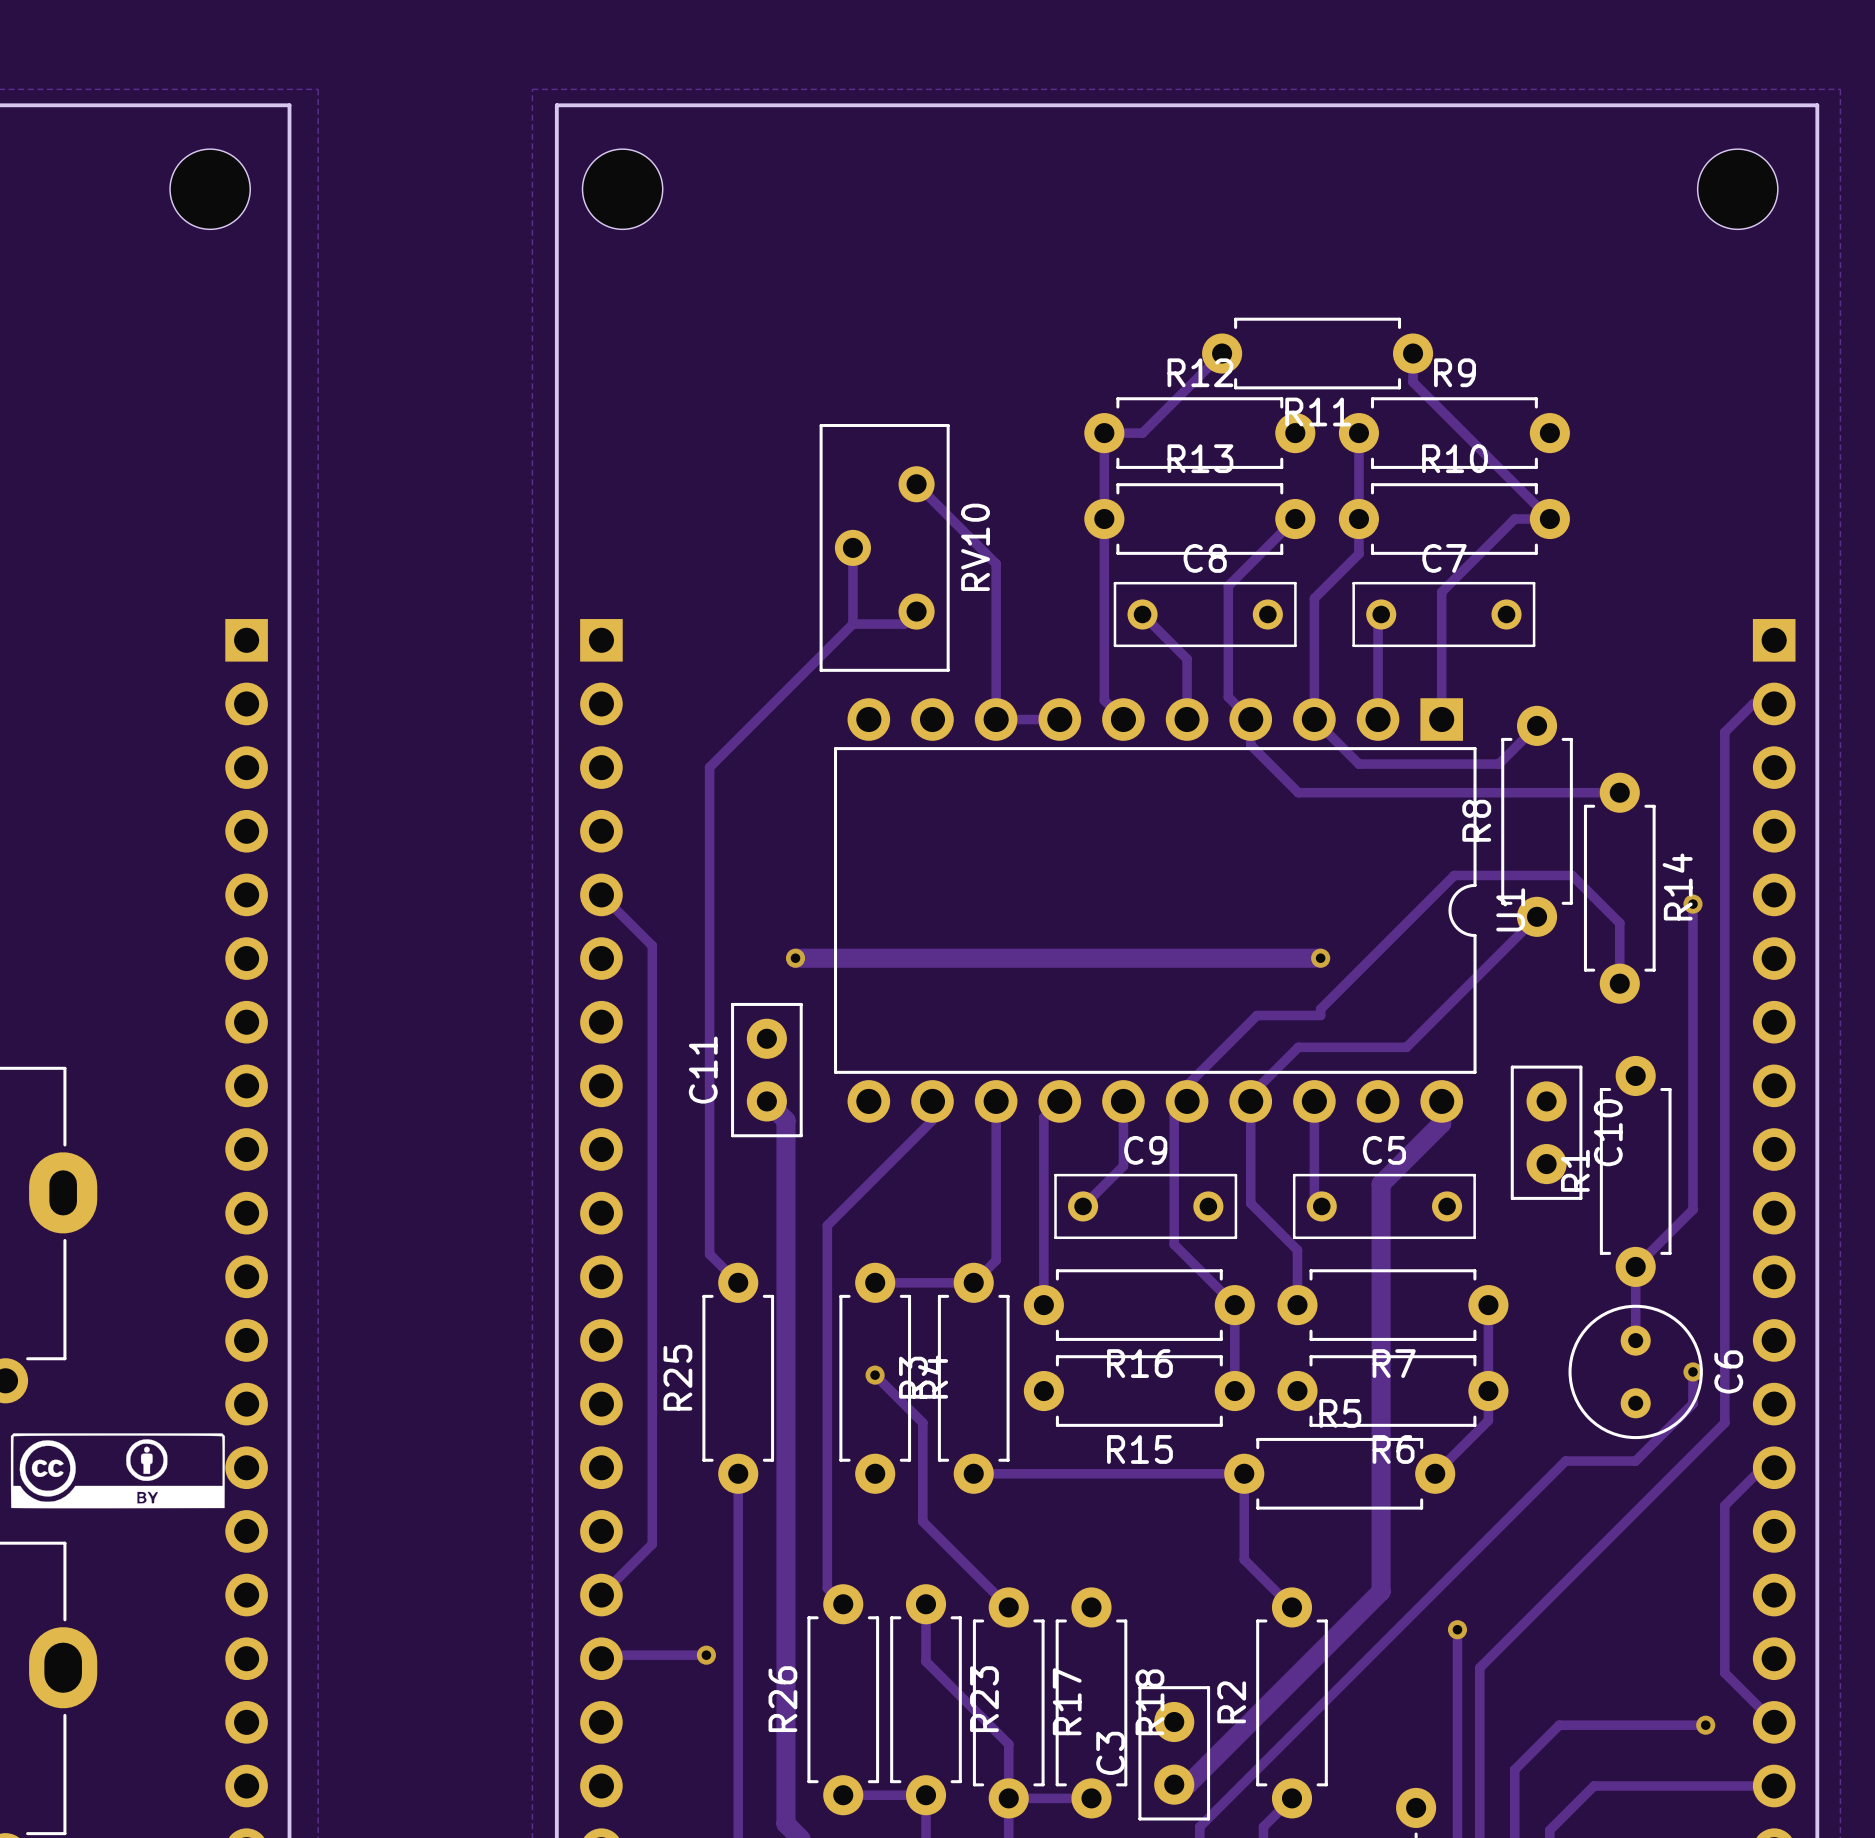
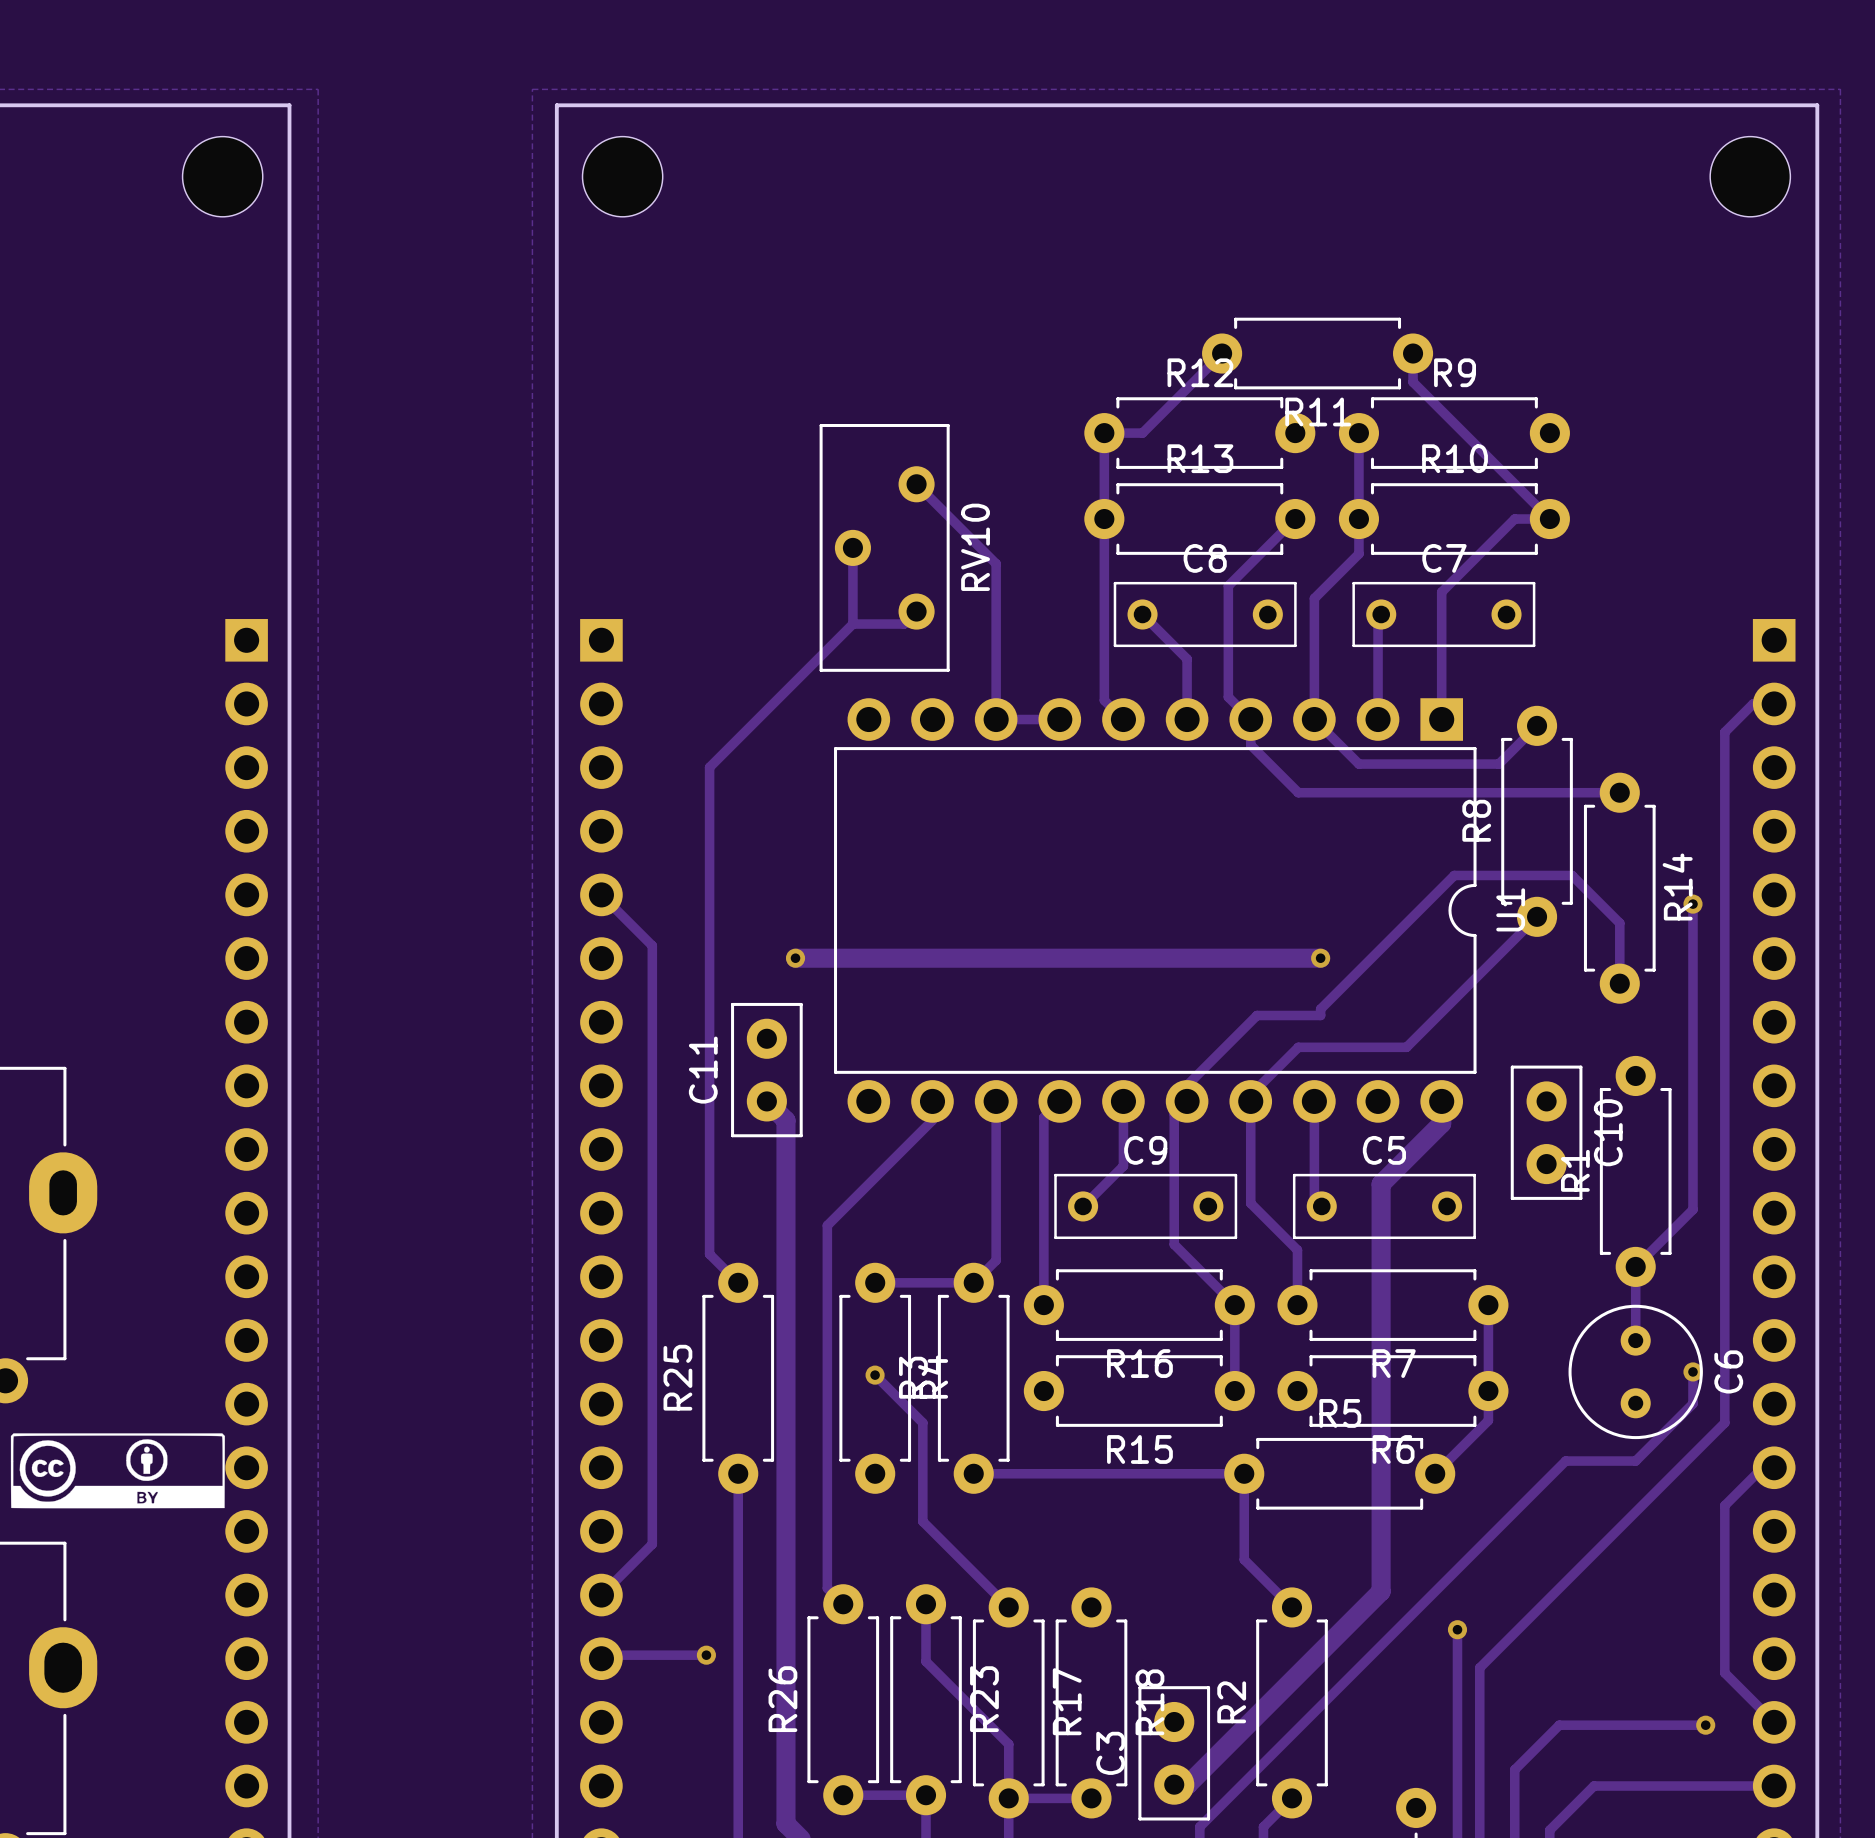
part position: (210, 189) -> (222, 176)
part position: (622, 189) -> (622, 176)
part position: (1737, 189) -> (1750, 176)

